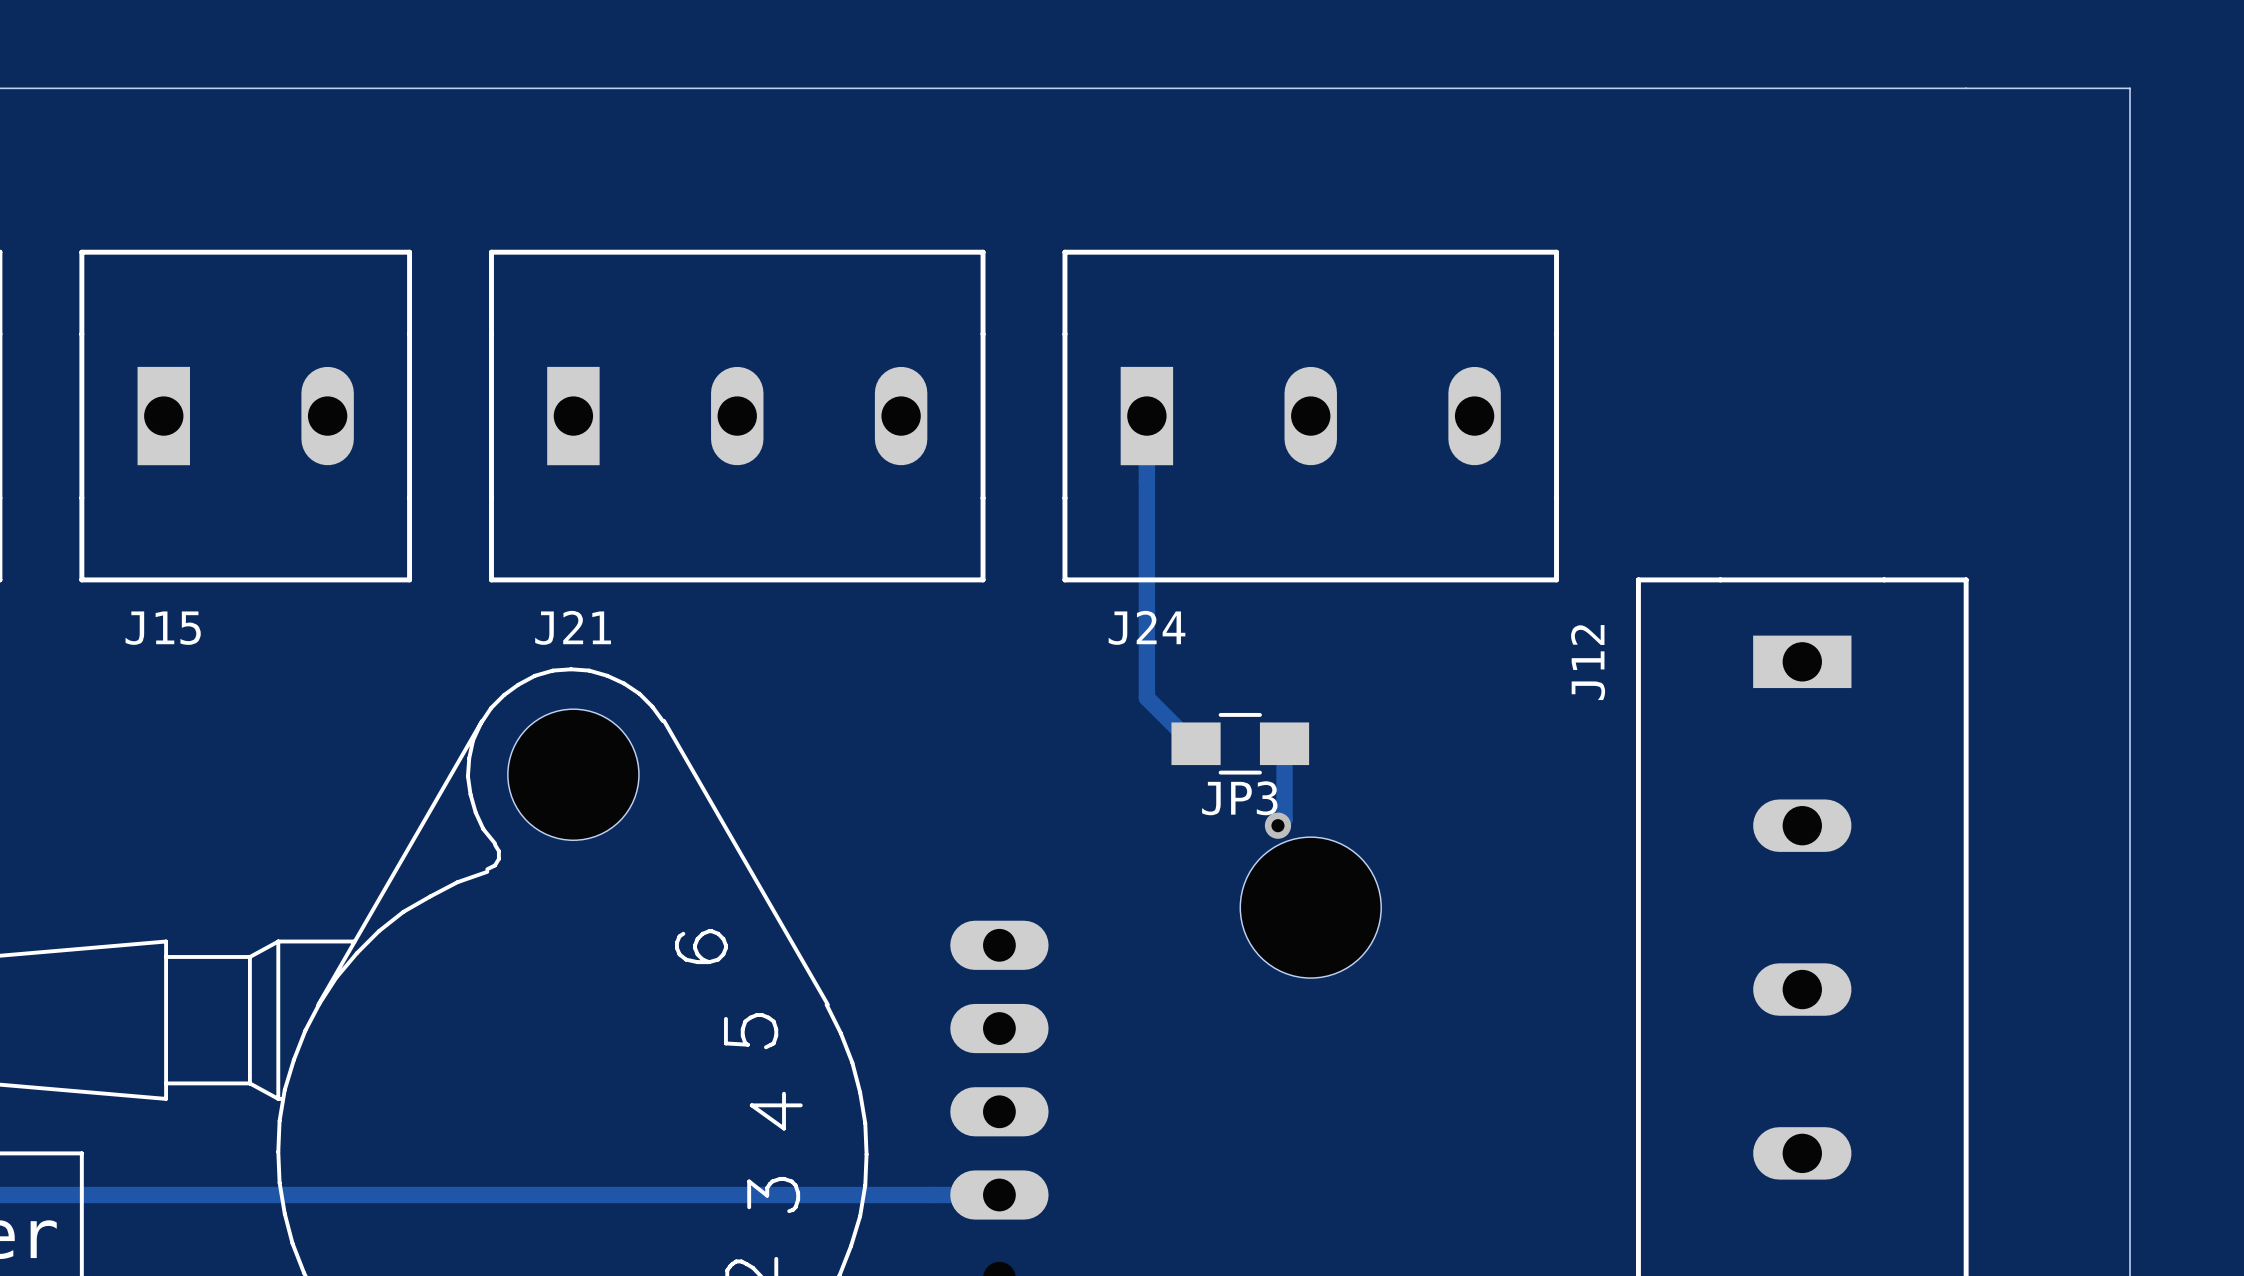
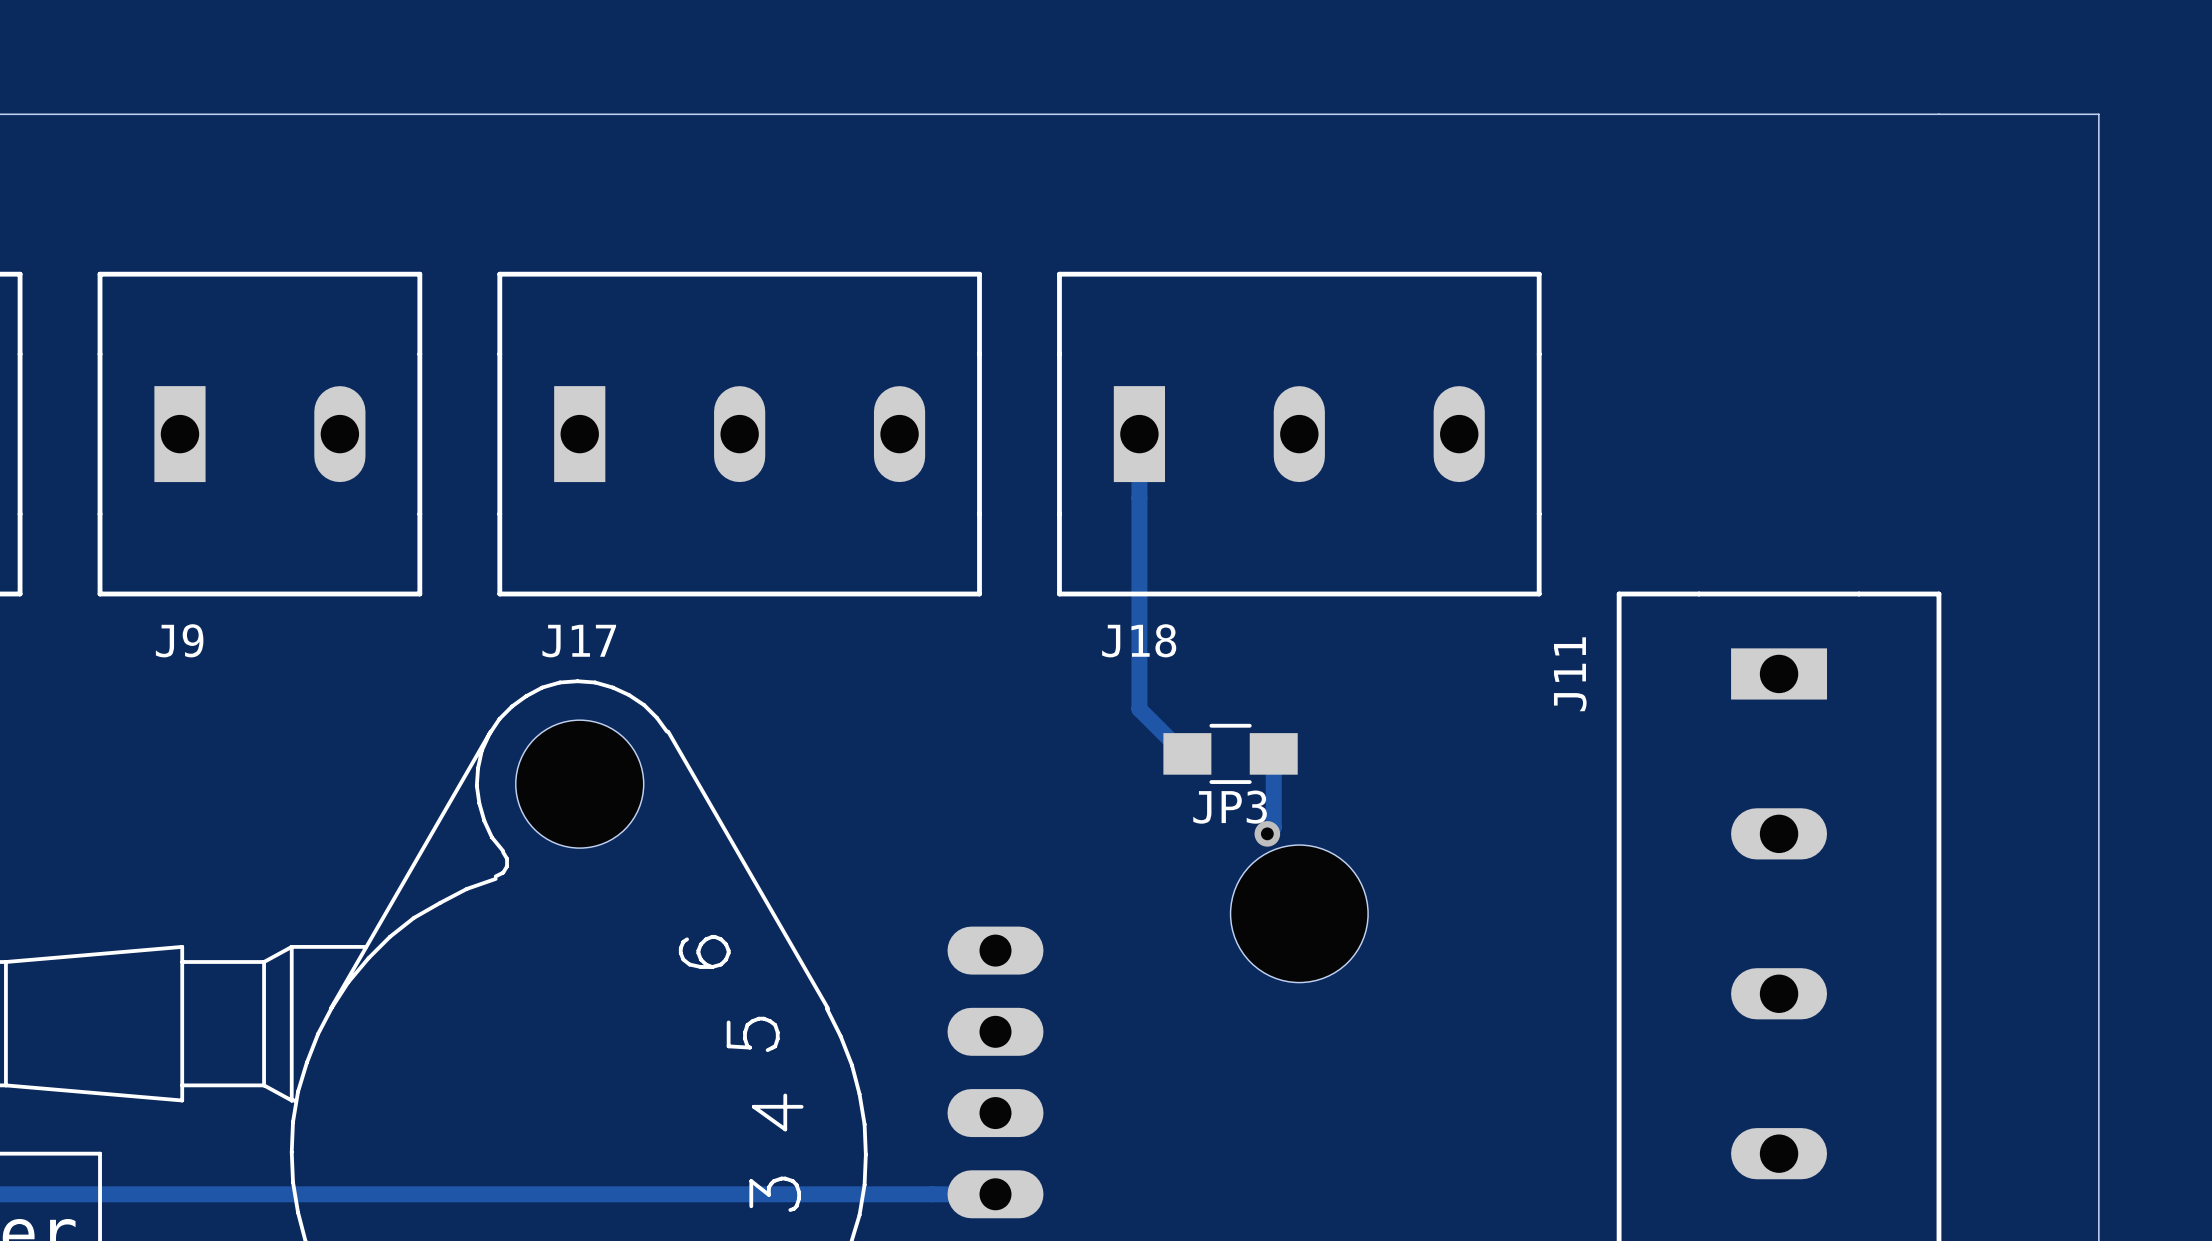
J21 name: J21 (573, 627) -> J17 (579, 641)
J24 name: J24 (1147, 627) -> J18 (1139, 640)
J15 name: J15 (163, 628) -> J9 (179, 640)
J12 name: J12 (1588, 662) -> J11 (1570, 674)

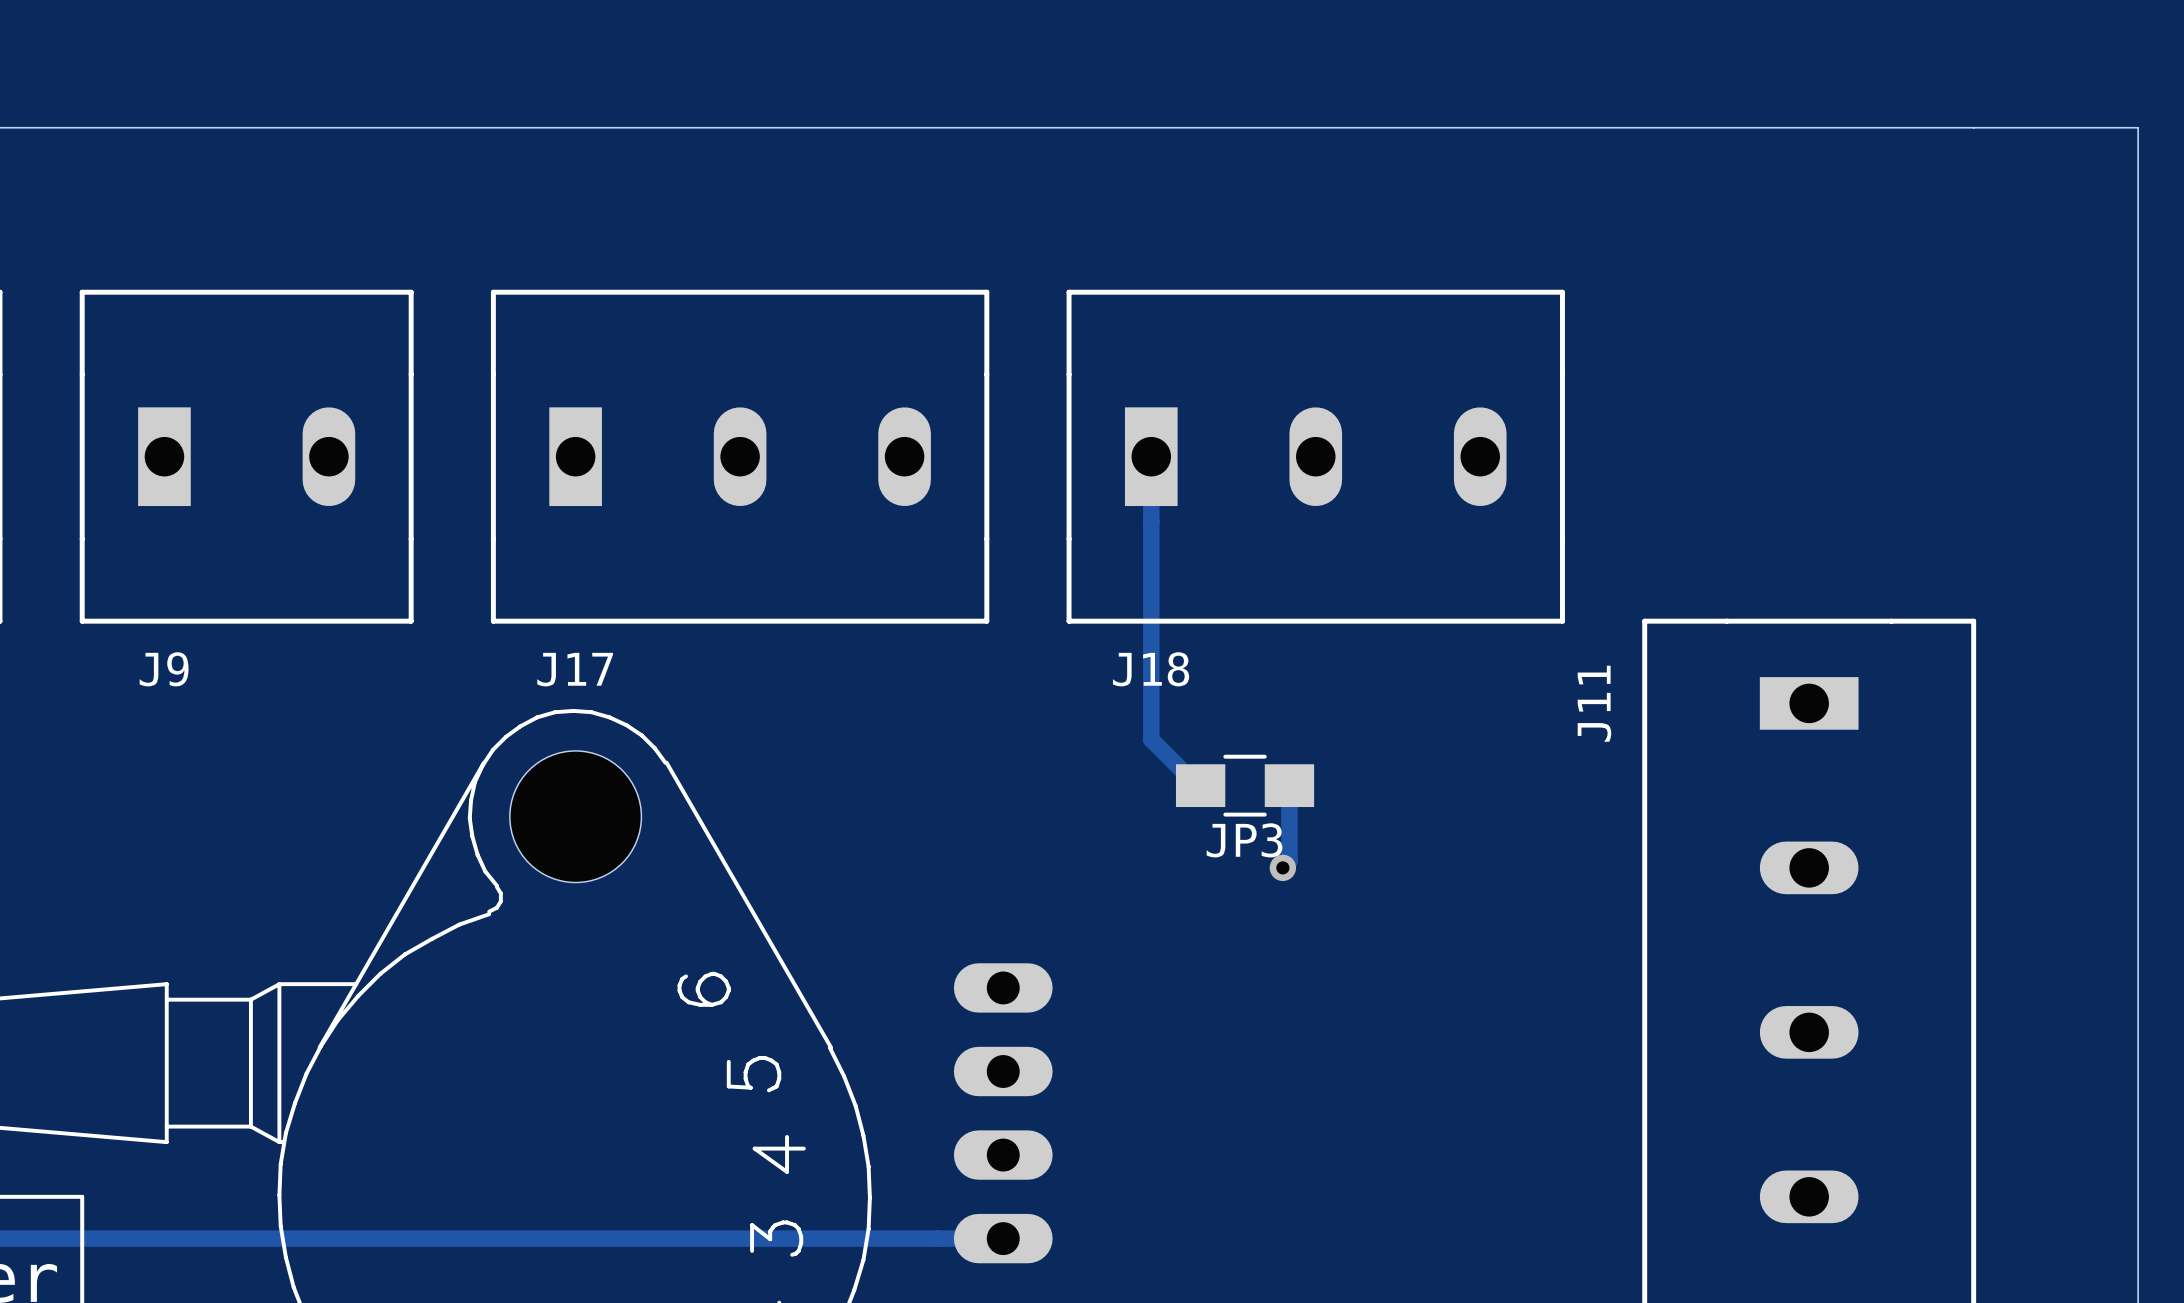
part: (1299, 913) -> none

